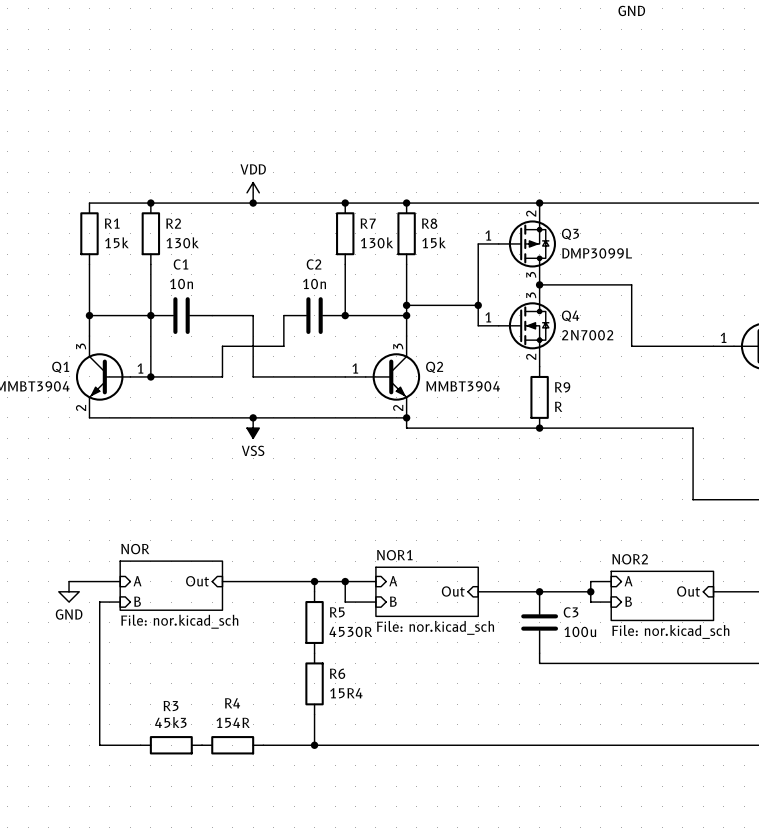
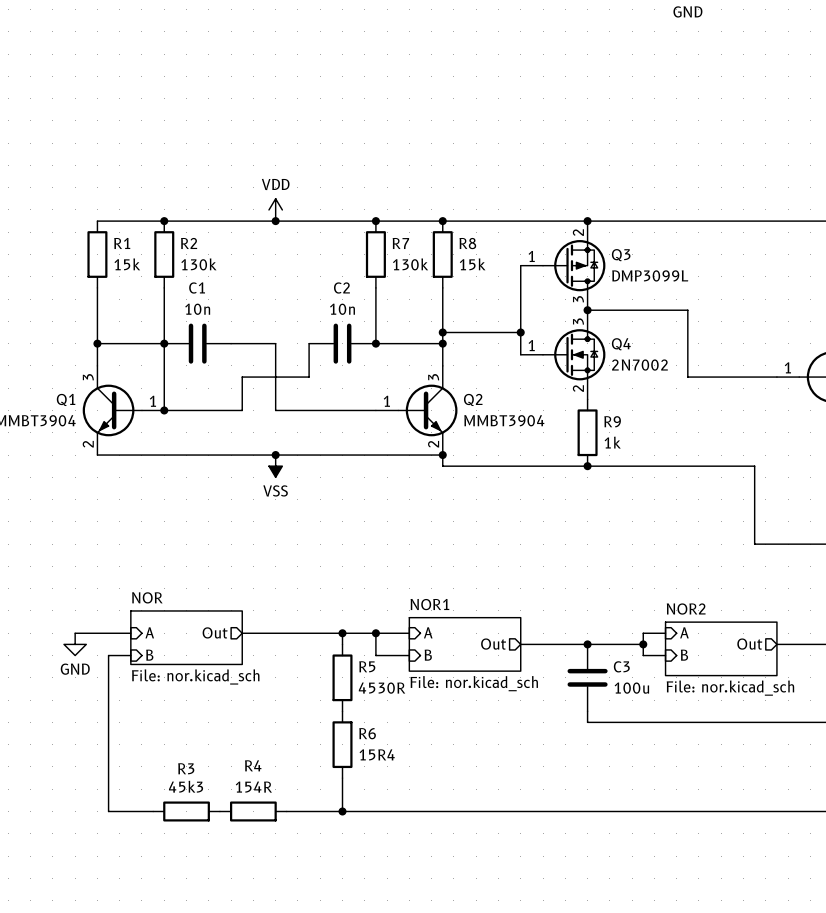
R9 value: R (558, 406) -> 1k (612, 442)
sheet pin shape: input (197, 581) -> output (215, 632)
sheet pin shape: input (453, 591) -> output (493, 644)
sheet pin shape: input (688, 591) -> output (749, 644)

